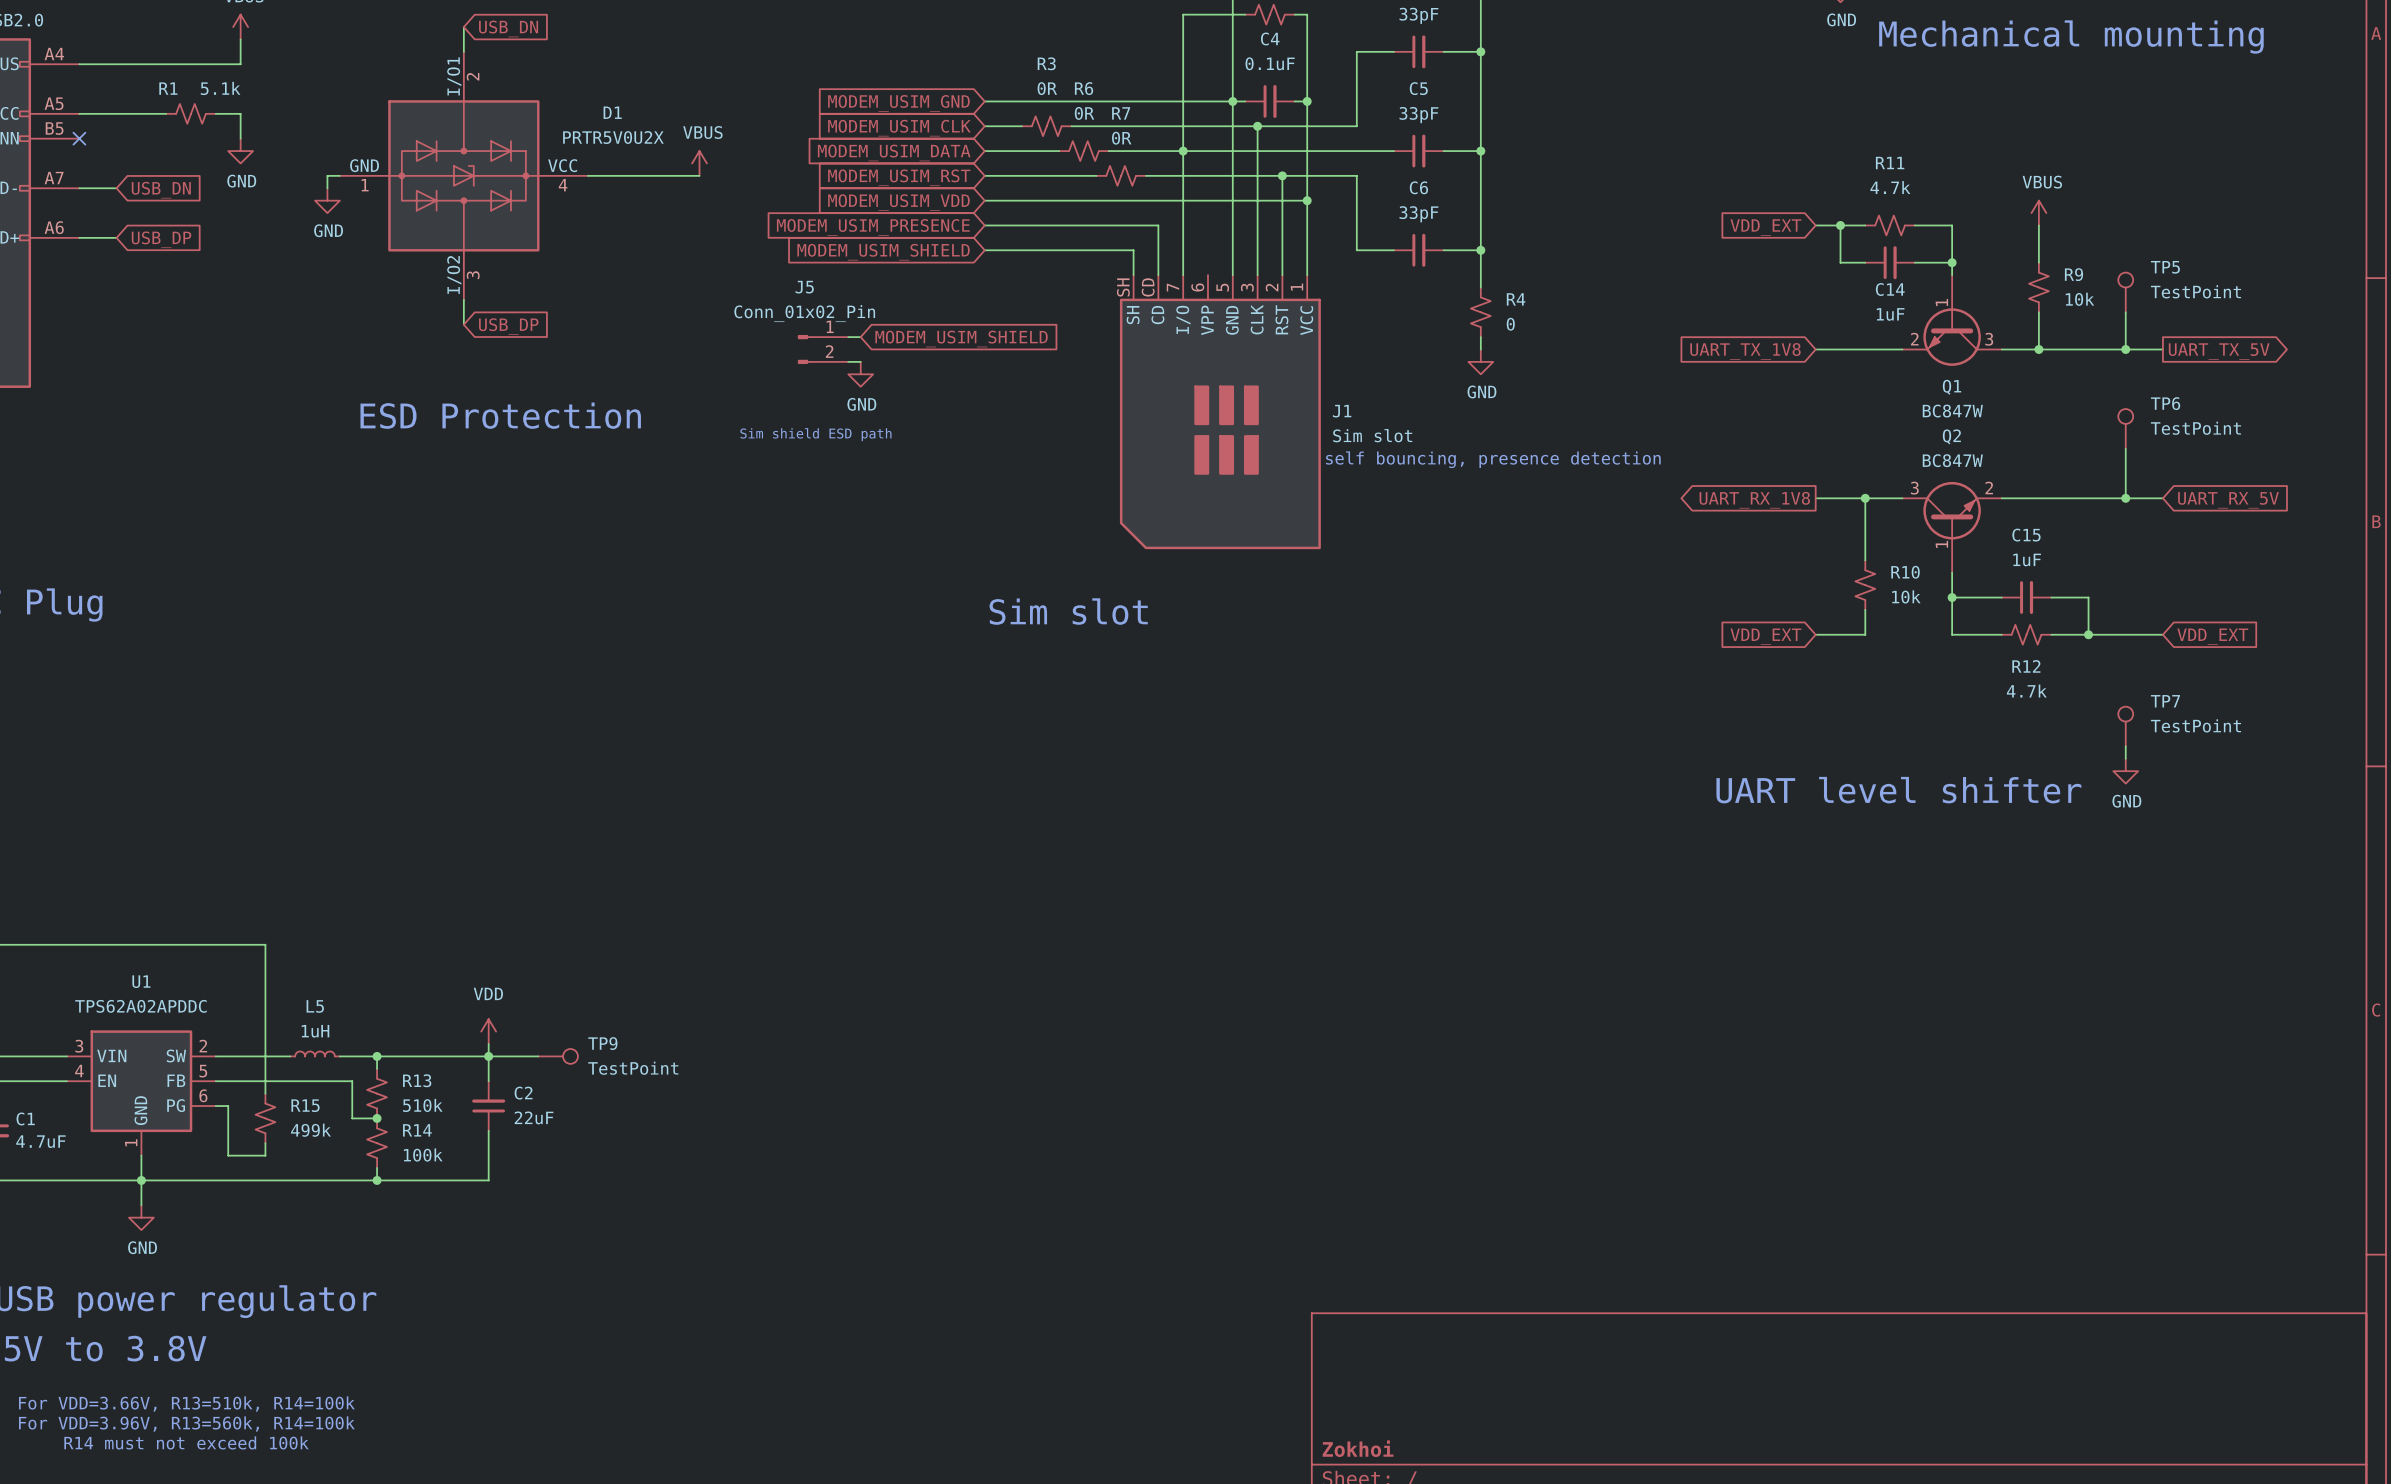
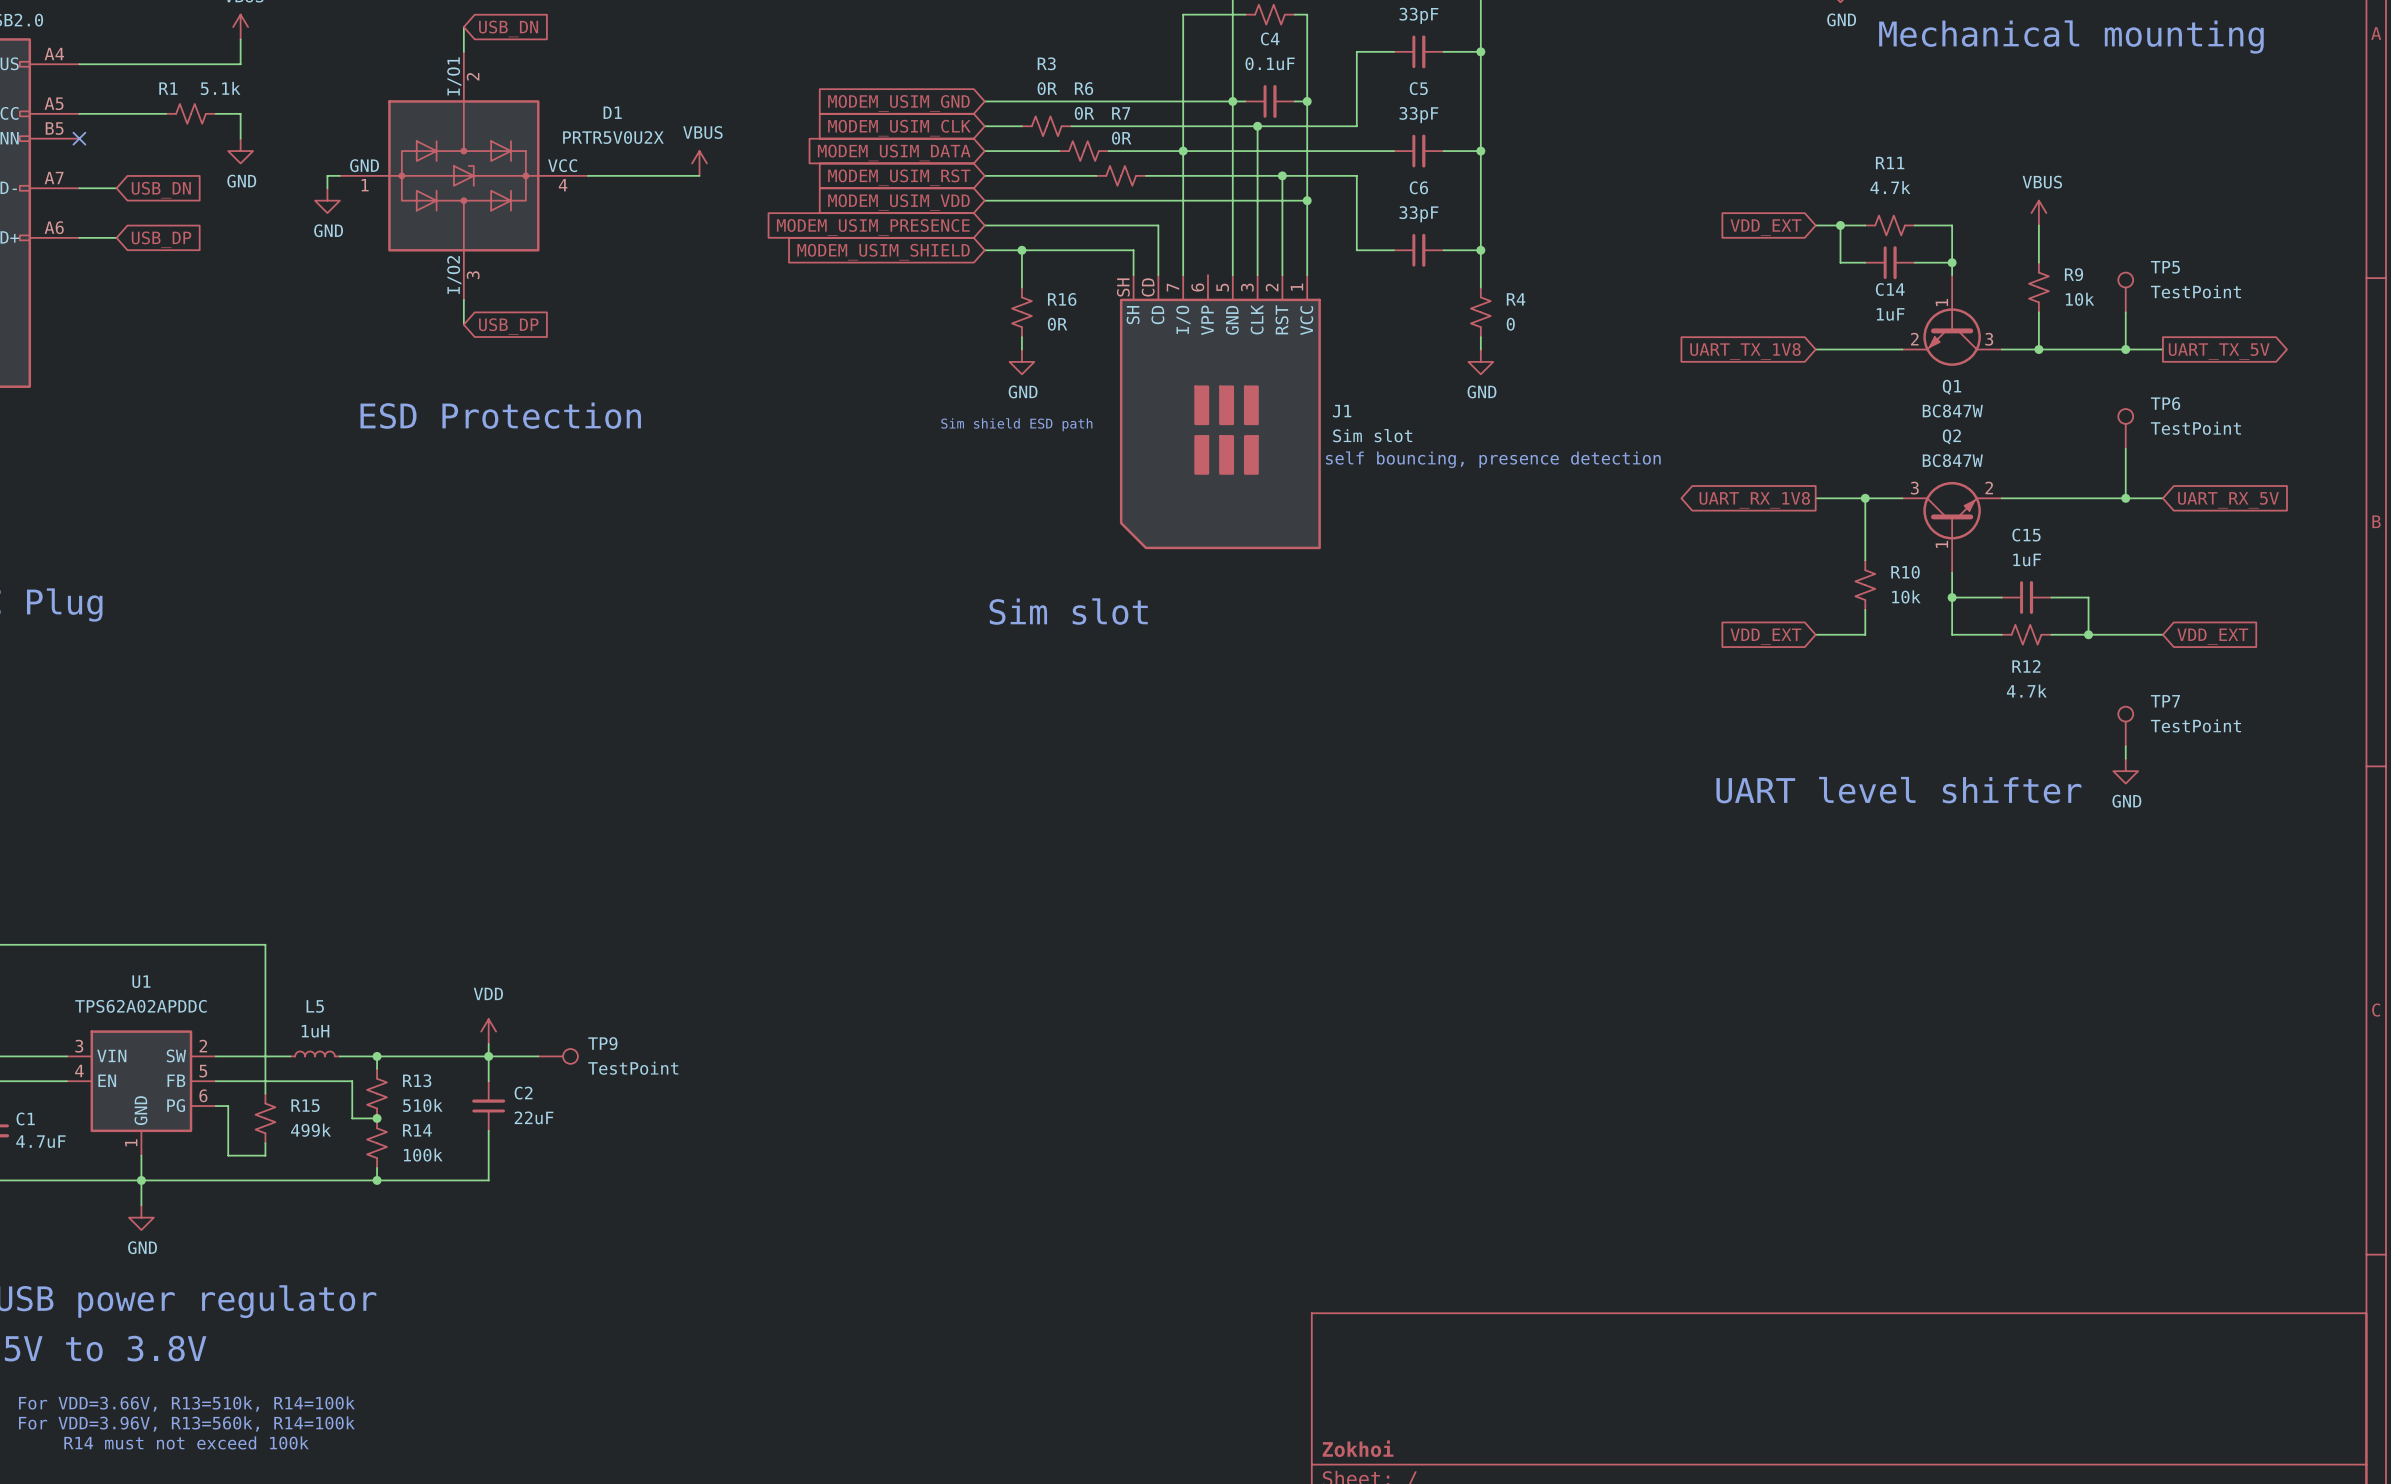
wire: none -> (1021, 250) (1021, 287)
junction: none -> (1021, 250)
R16: none -> 0R (1021, 312)
wire: (848, 337) (860, 337) -> none
wire: none -> (1021, 337) (1021, 349)
global label: MODEM_USIM_SHIELD (961, 338) -> none
J5: Conn_01x02_Pin (823, 349) -> none
wire: (848, 361) (860, 361) -> none
power symbol position: GND (860, 374) -> GND (1021, 361)
text position: Sim shield ESD path (815, 434) -> Sim shield ESD path (1016, 424)

